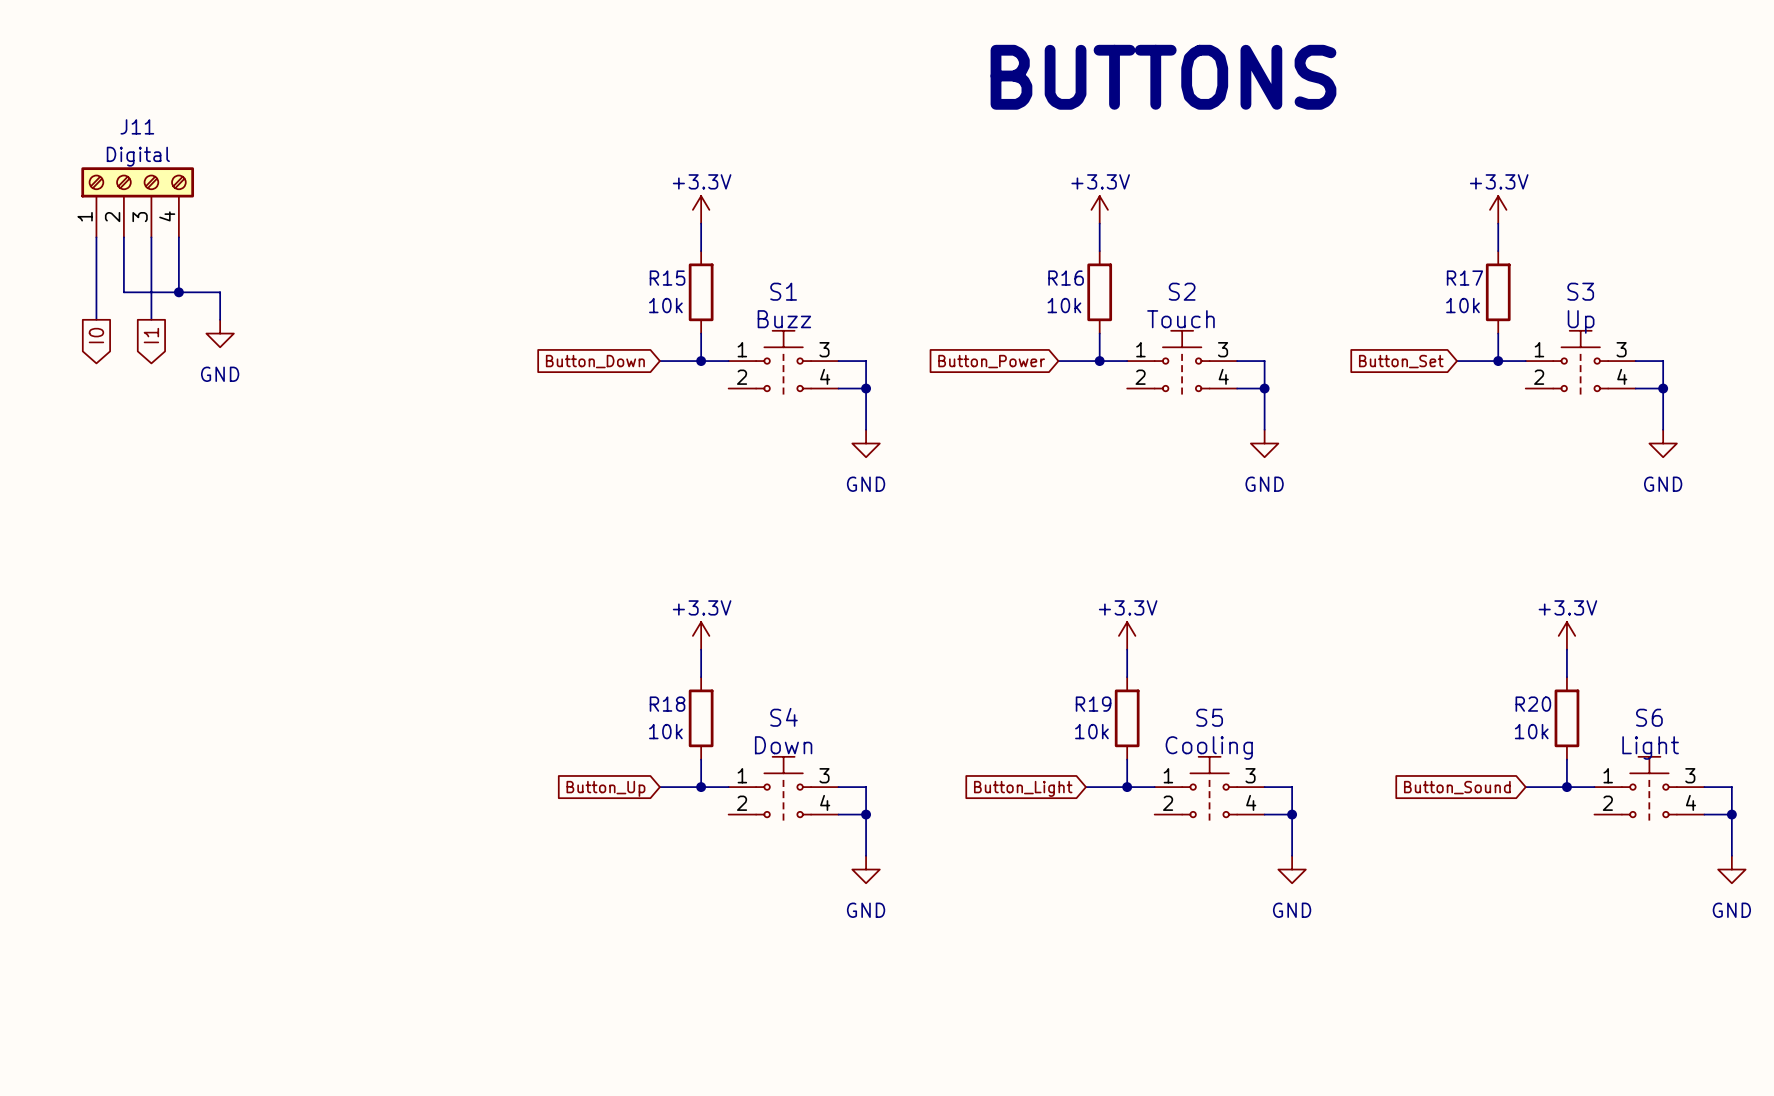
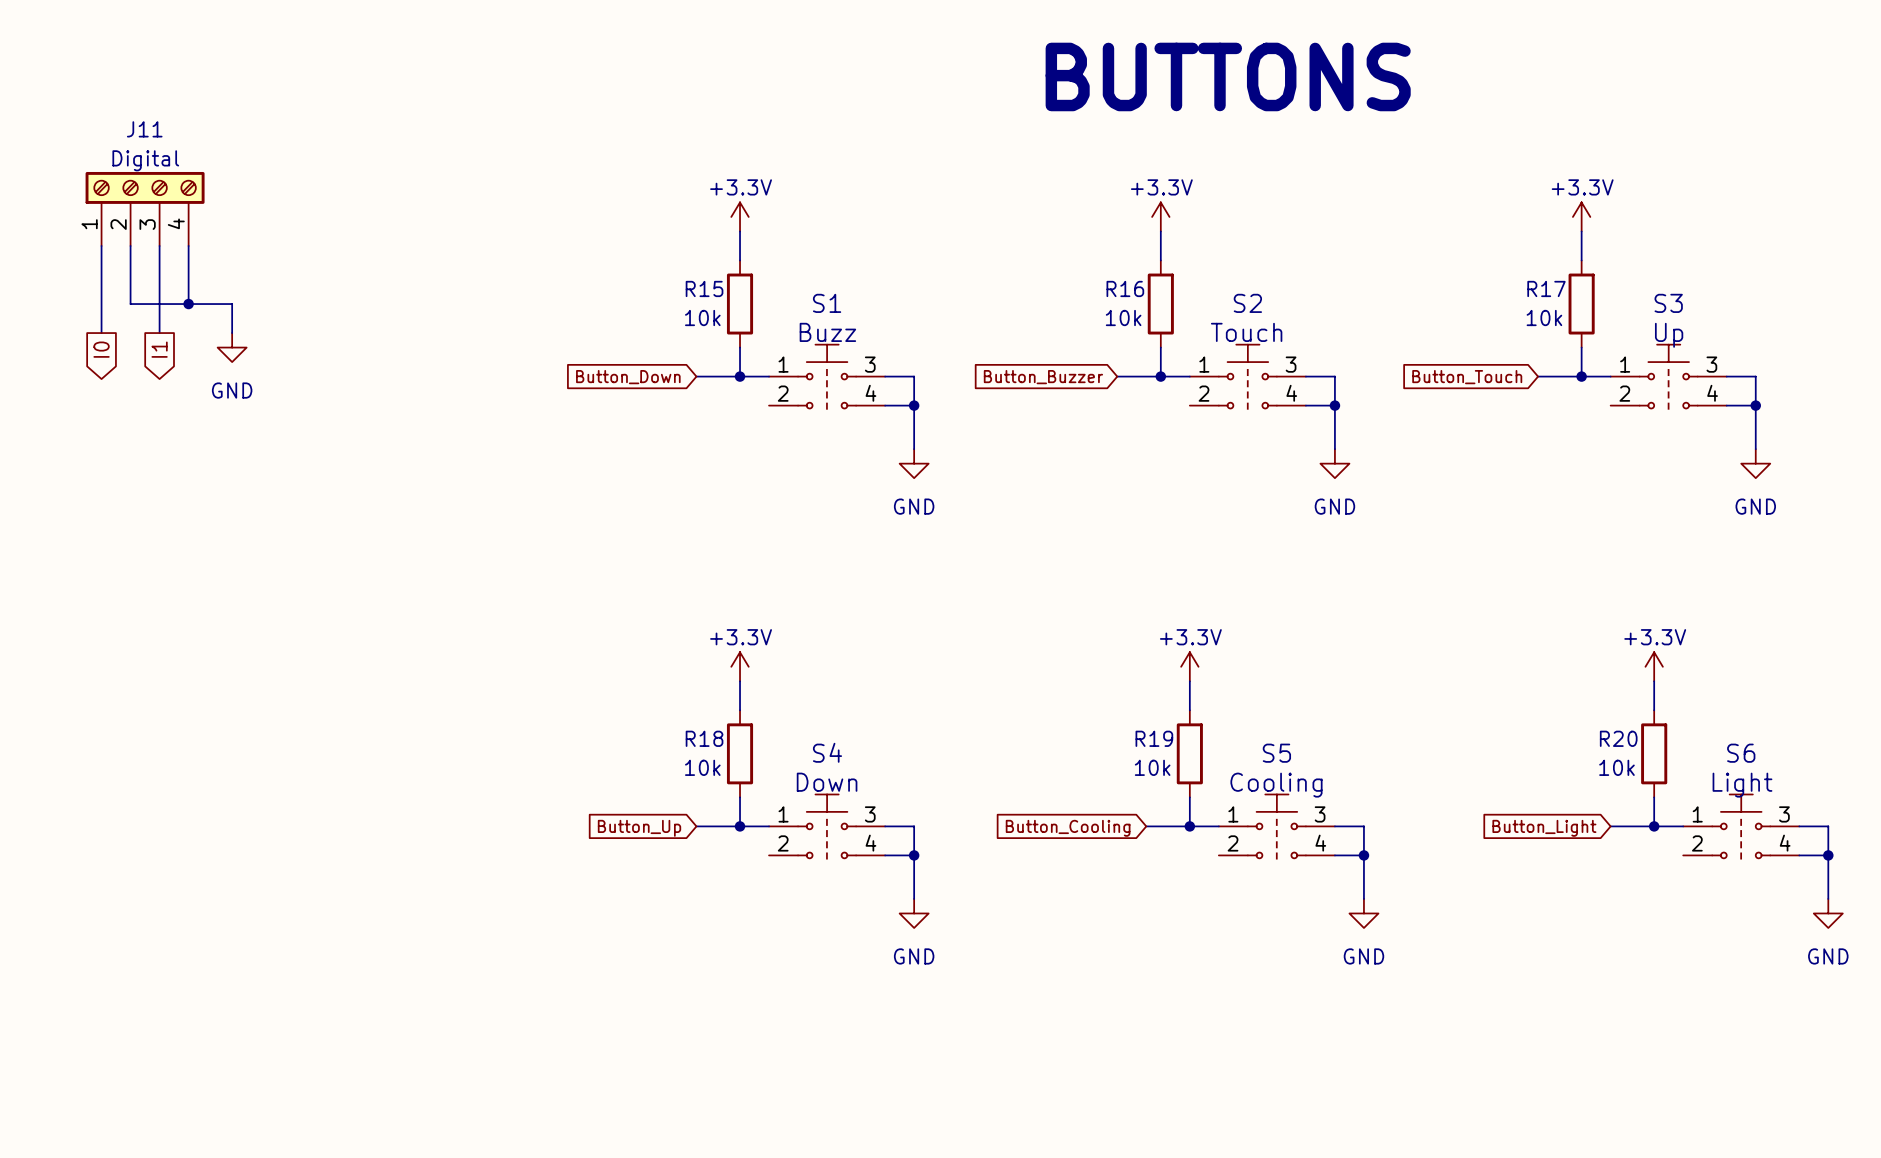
global label: Button_Power (991, 361) -> Button_Buzzer (1043, 377)
global label: Button_Set (1401, 361) -> Button_Touch (1467, 377)
global label: Button_Sound (1457, 787) -> Button_Light (1544, 828)
global label: Button_Light (1023, 788) -> Button_Cooling (1068, 828)

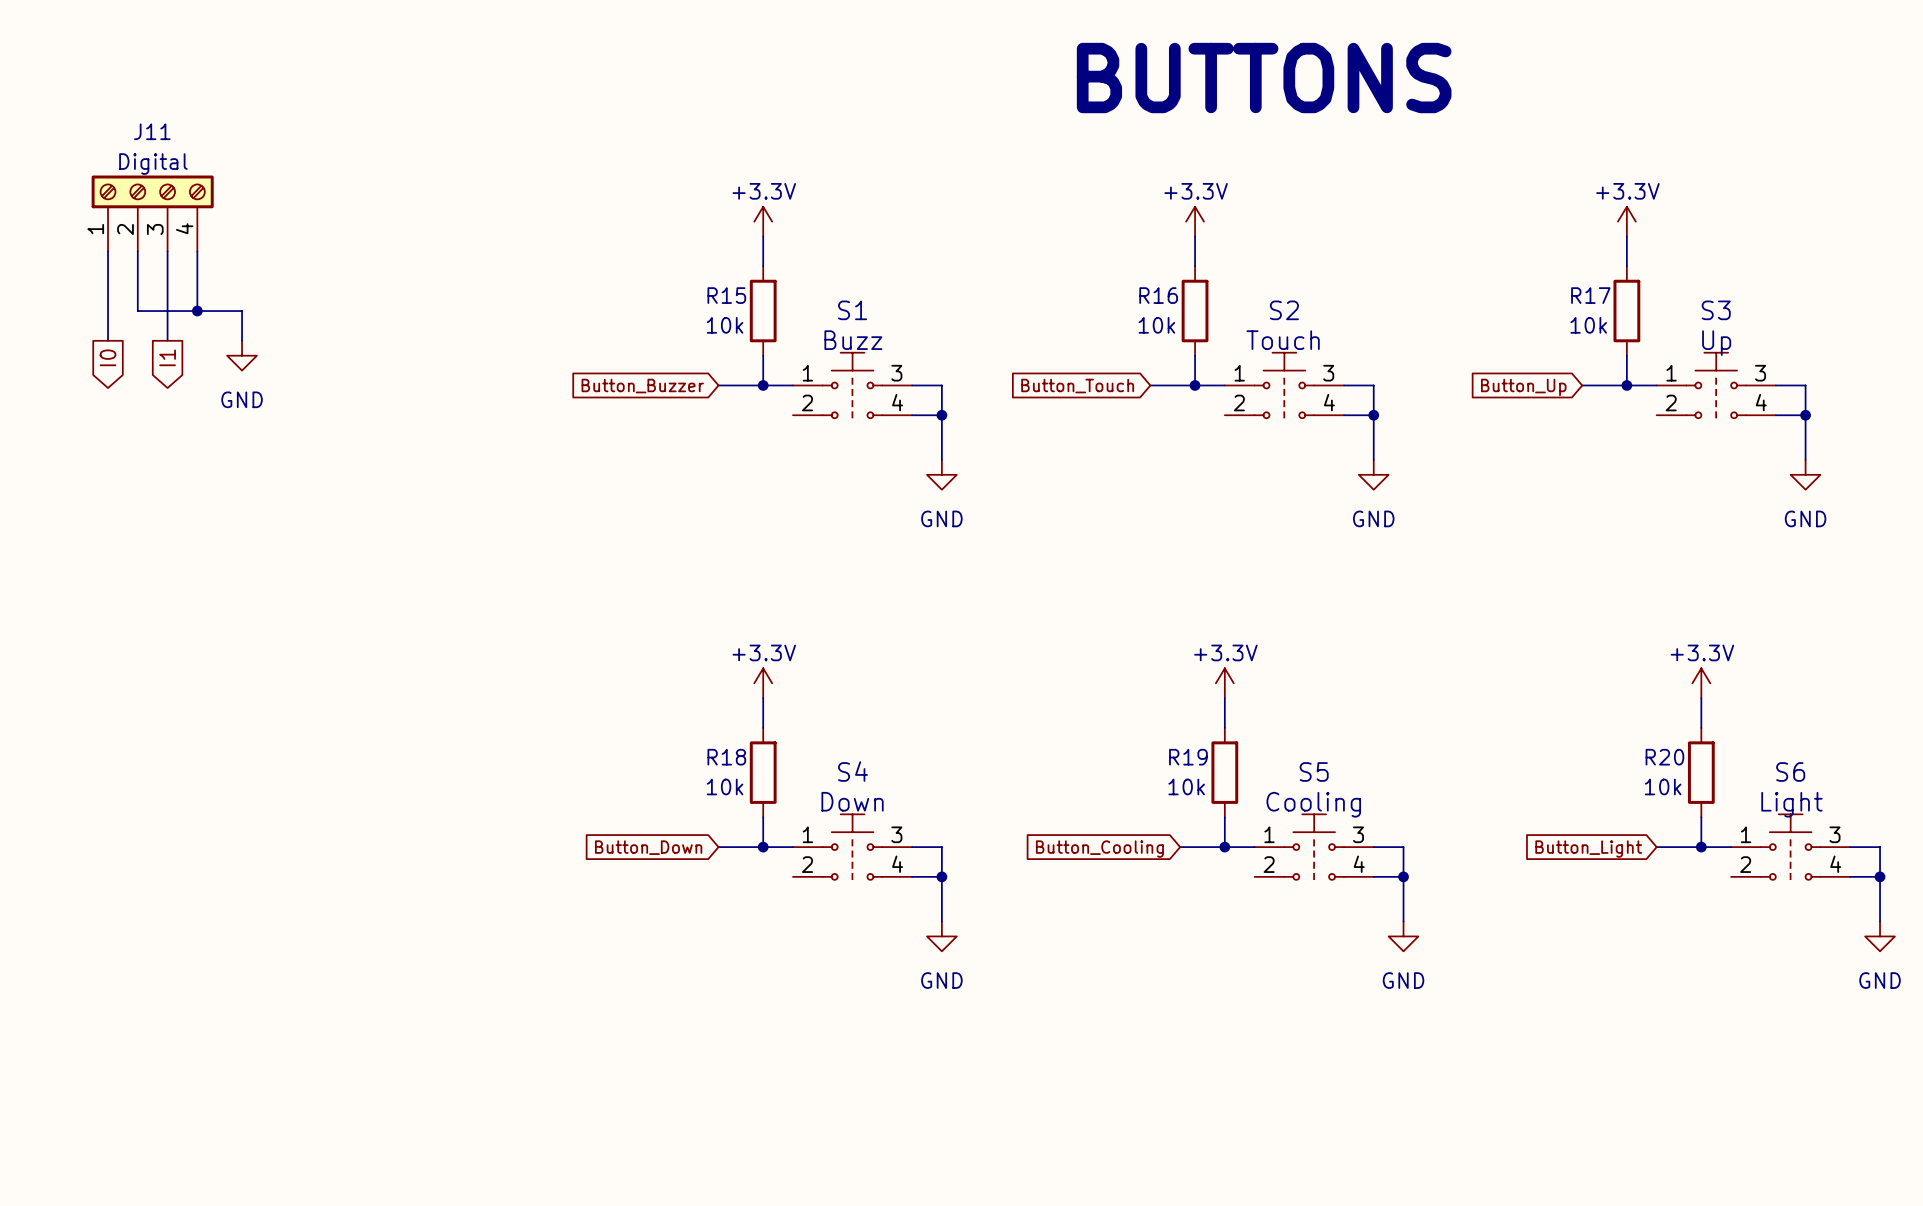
global label: Button_Down (628, 377) -> Button_Buzzer (642, 386)
global label: Button_Buzzer (1043, 377) -> Button_Touch (1077, 386)
global label: Button_Touch (1467, 377) -> Button_Up (1523, 387)
global label: Button_Up (639, 828) -> Button_Down (648, 847)

